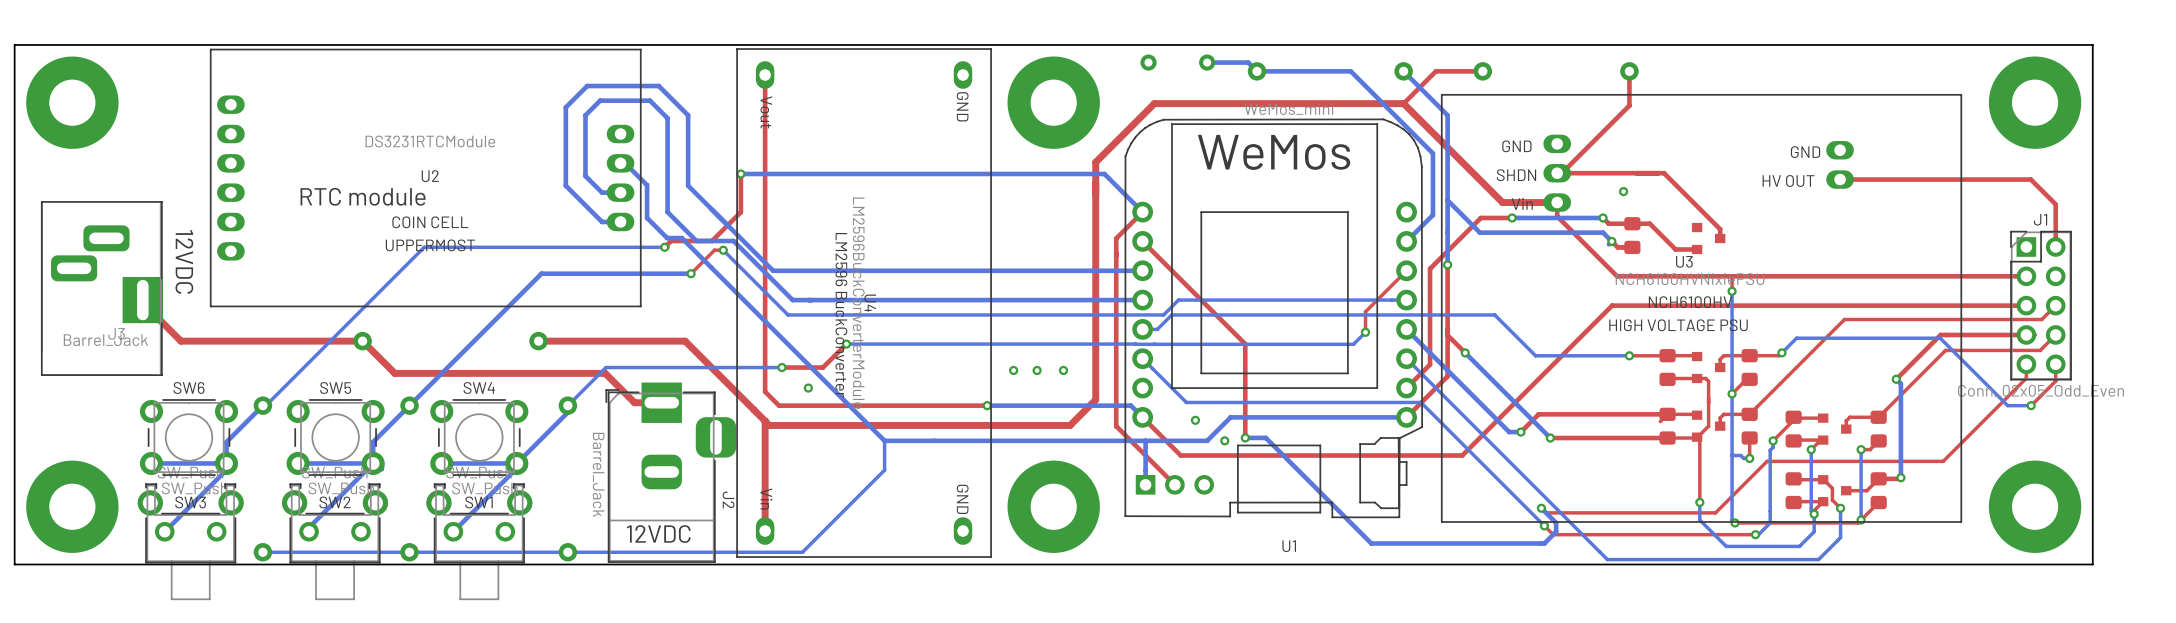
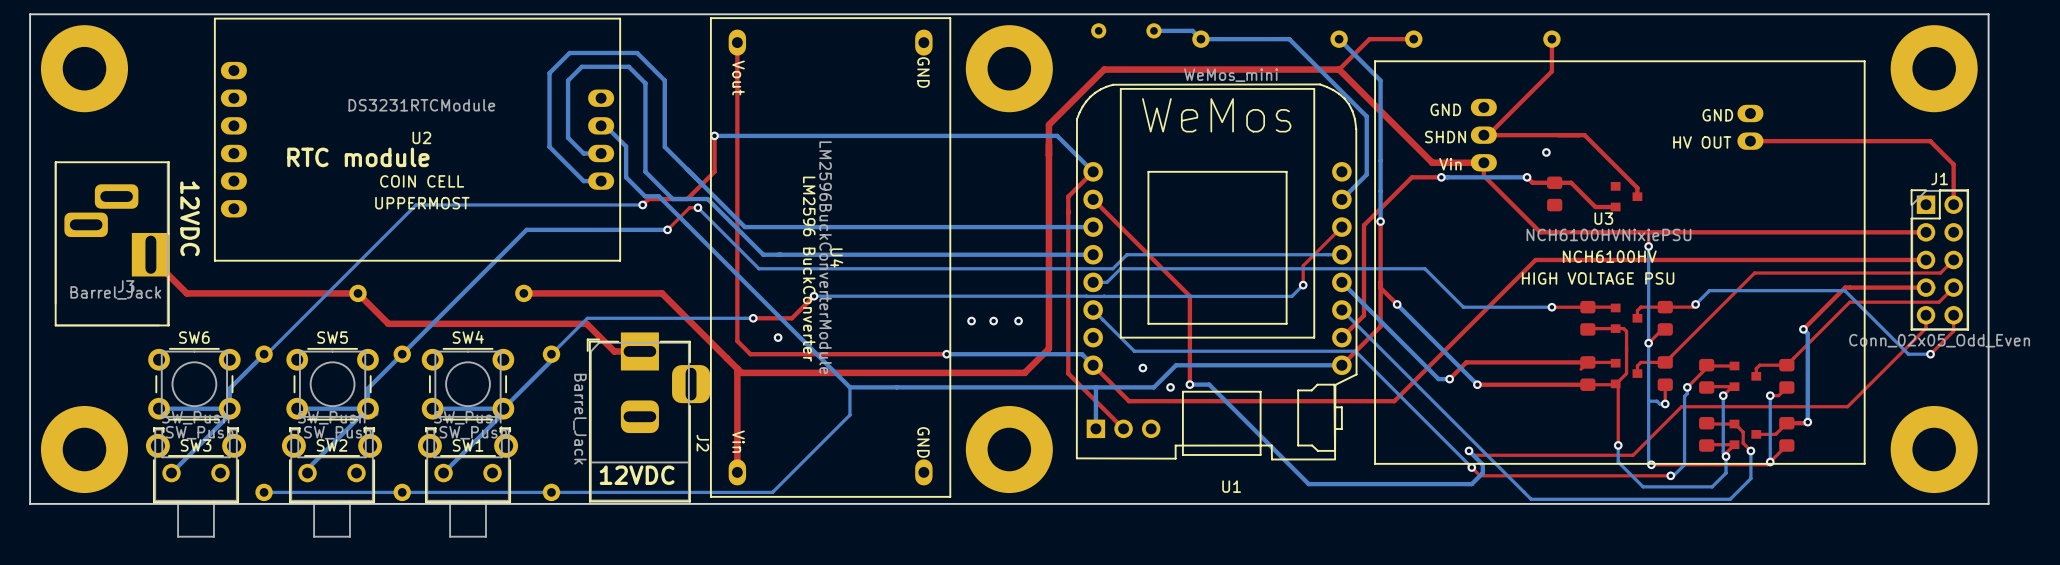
bottom track: (1447, 200) (1479, 232) (1603, 232) (1611, 241) (1608, 244) -> none
top track: (1611, 241) (1617, 247) (1632, 247) -> none
via: (1611, 241) -> none

